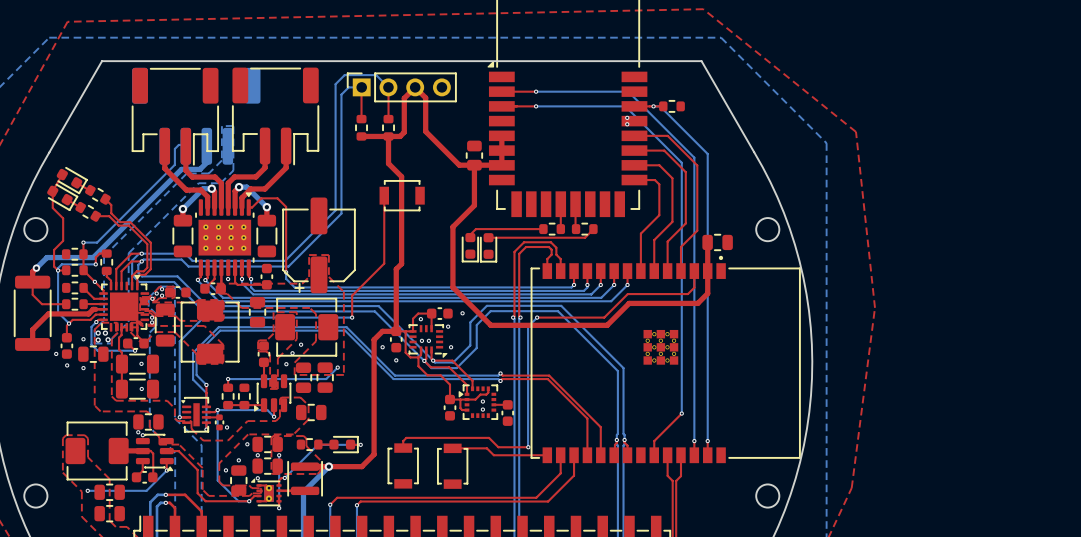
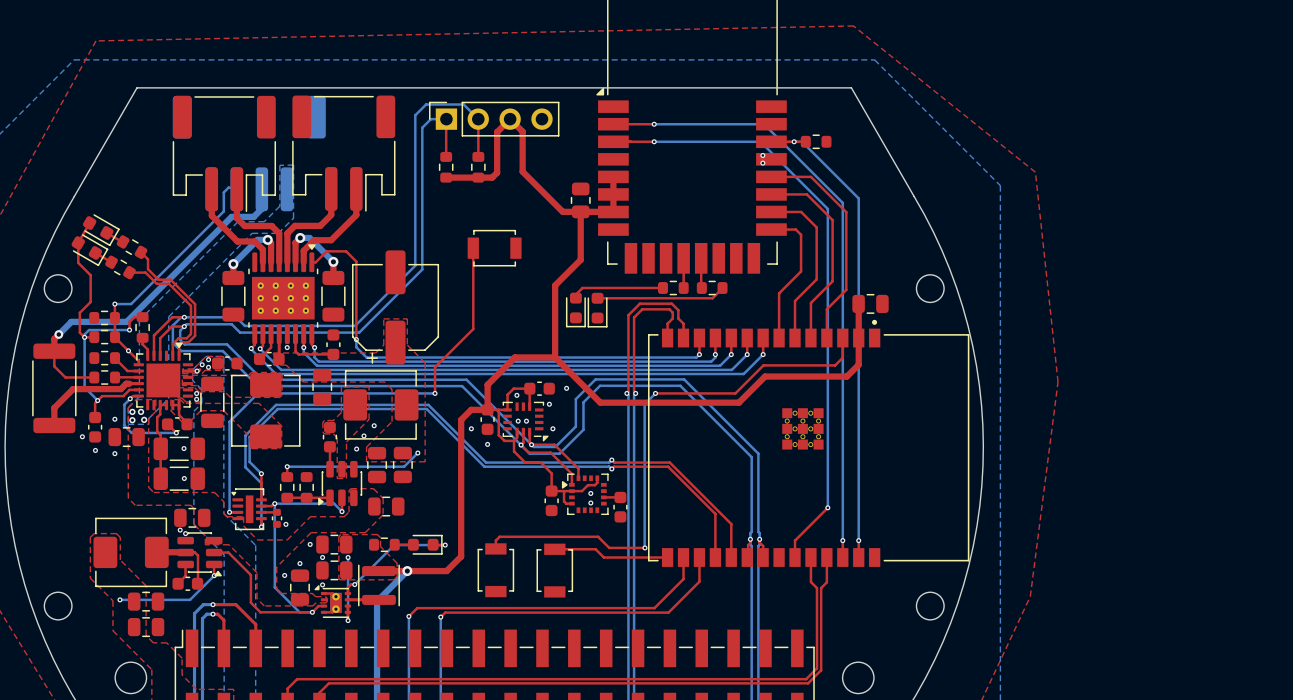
top track: (388, 136) (388, 163) (401, 176) (401, 263) (396, 269) (396, 310) -> (555, 357) (515, 357) (487, 384)

